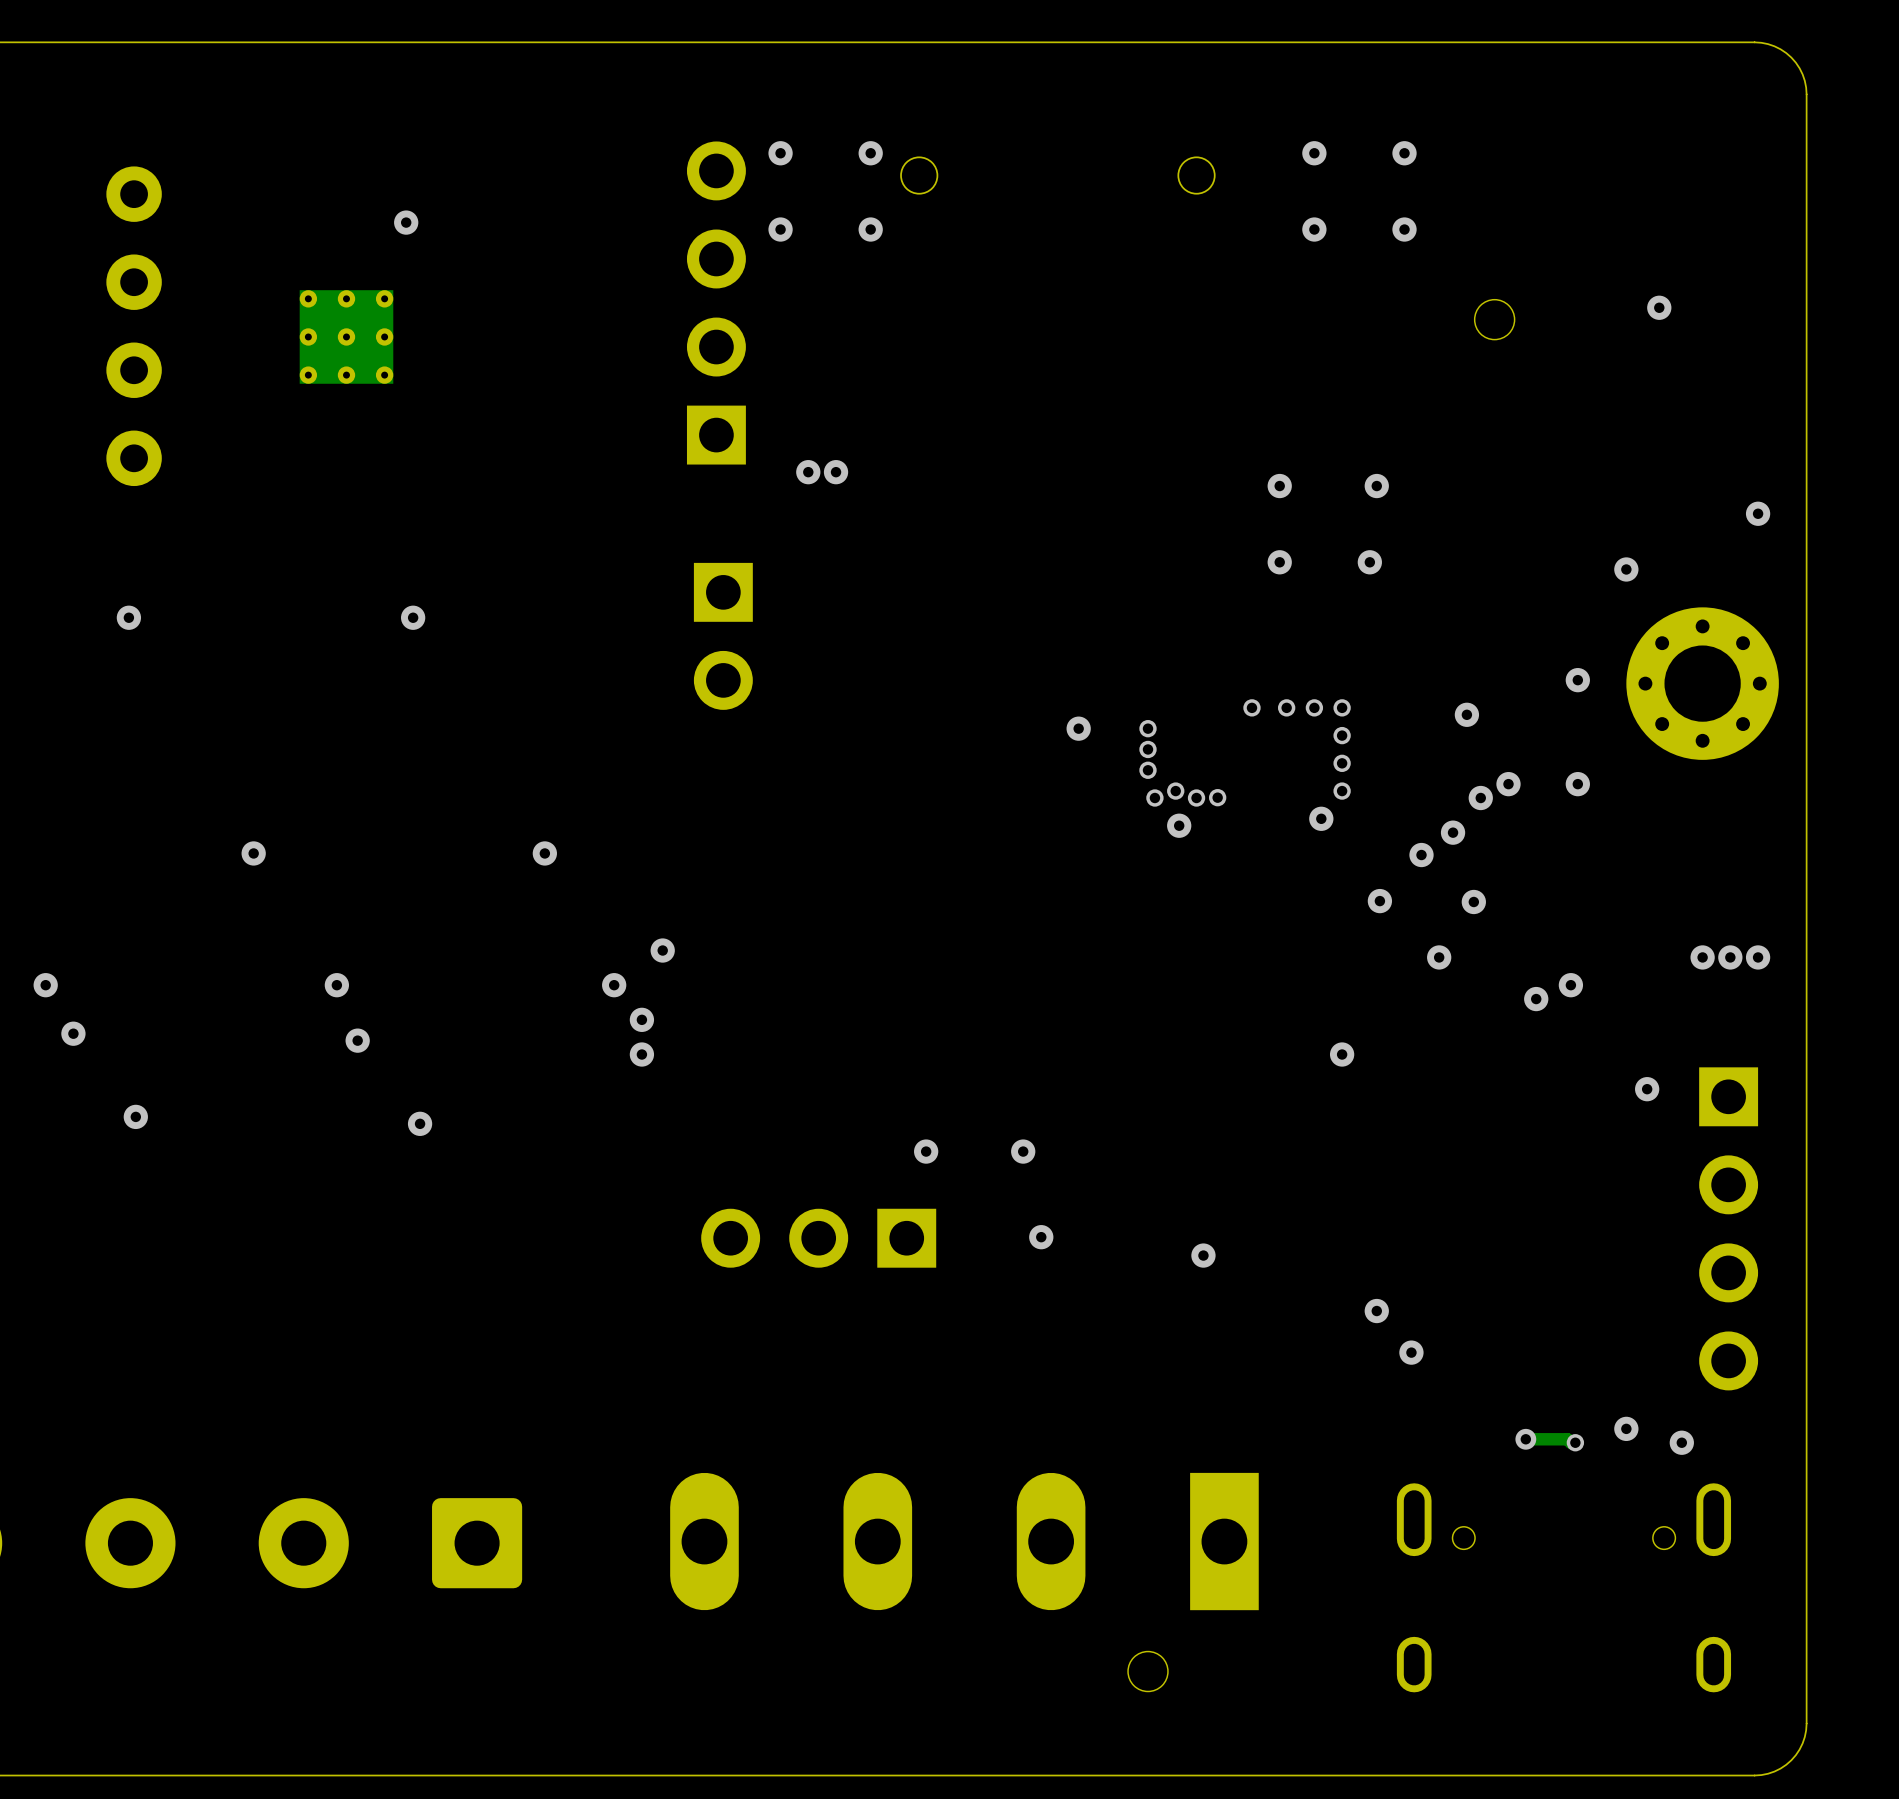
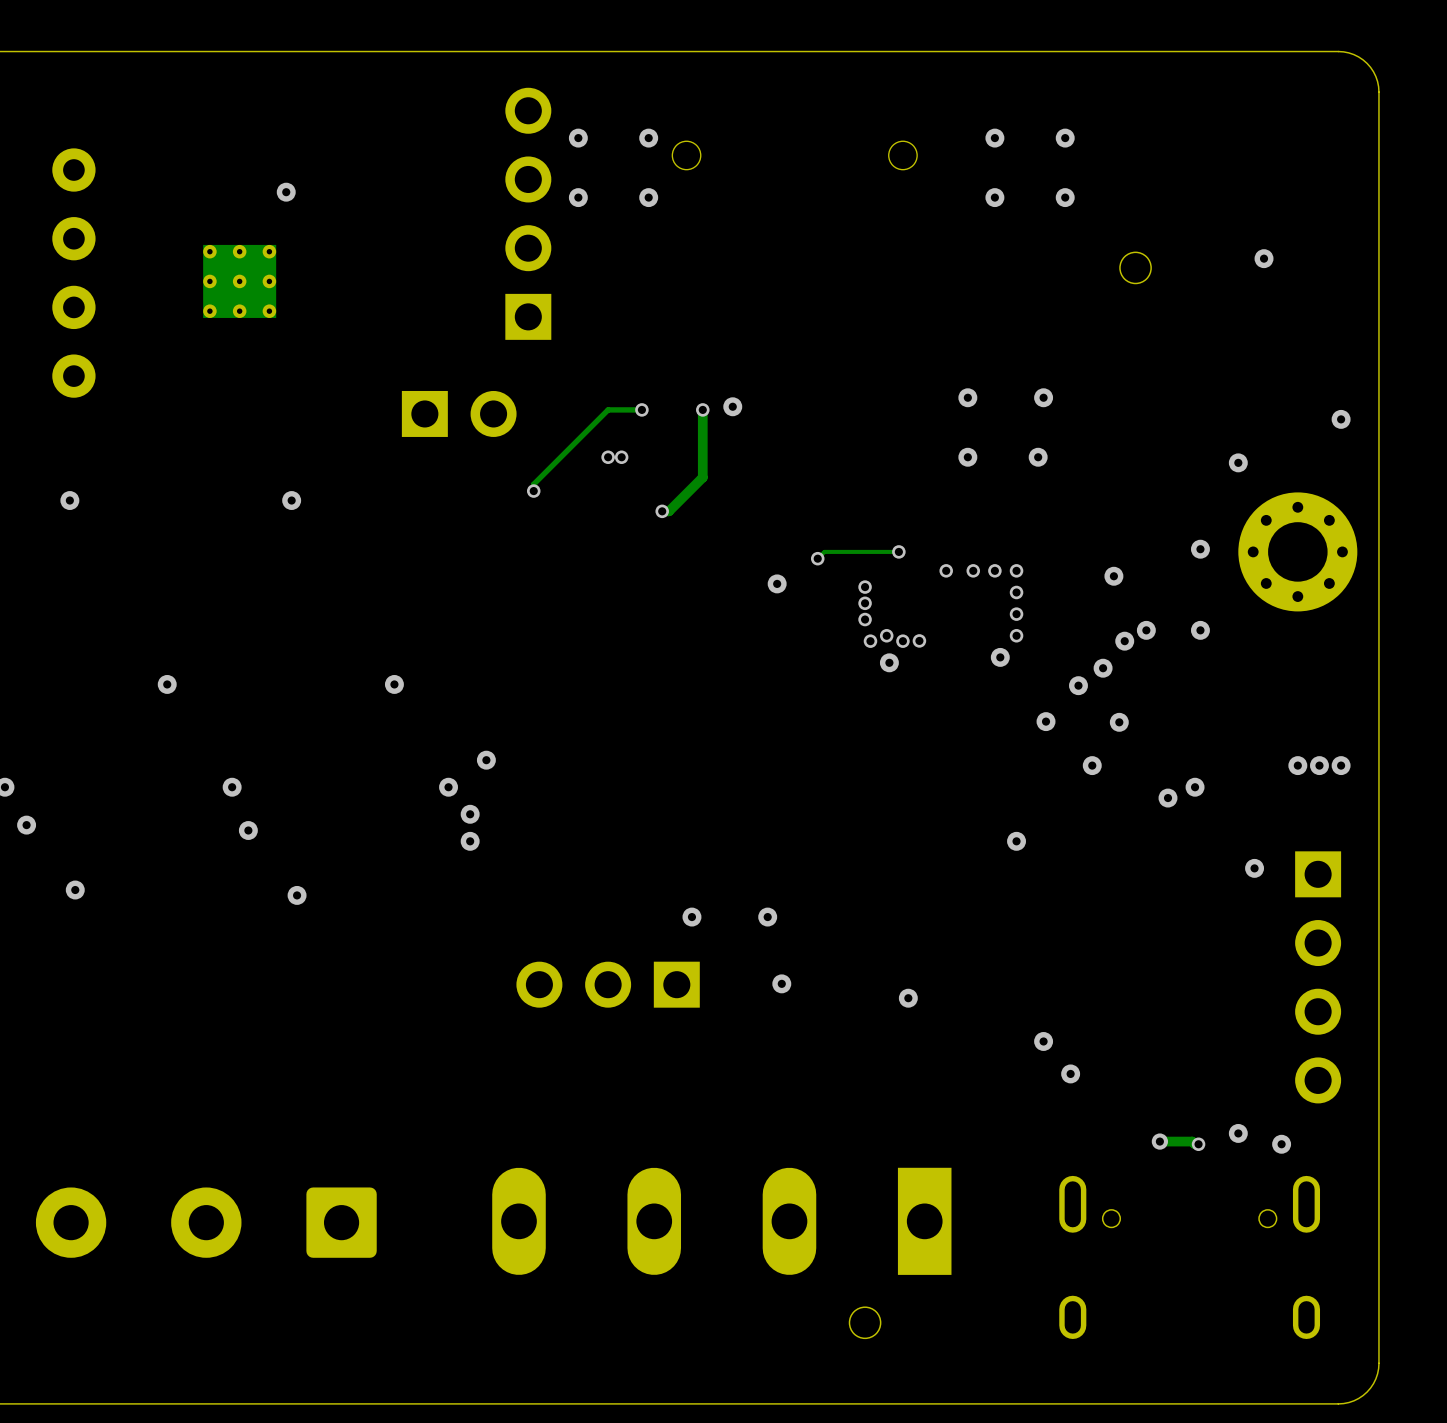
part position: (716, 303) -> (528, 213)
via: (808, 472) -> none
via: (836, 472) -> none
via: none -> (732, 406)
track: none -> (641, 409) (608, 409) (533, 484) (533, 491)
via: none -> (641, 409)
track: none -> (702, 409) (702, 477) (668, 511) (662, 511)
via: none -> (702, 409)
via: none -> (608, 457)
via: none -> (621, 457)
via: none -> (533, 491)
via: none -> (662, 511)
part rotation: 0° (723, 636) -> 90° counterclockwise (459, 413)
part position: (723, 636) -> (459, 413)
track: none -> (898, 551) (824, 551) (817, 558)
via: none -> (898, 551)
via: none -> (817, 558)
via position: (1078, 728) -> (777, 583)

